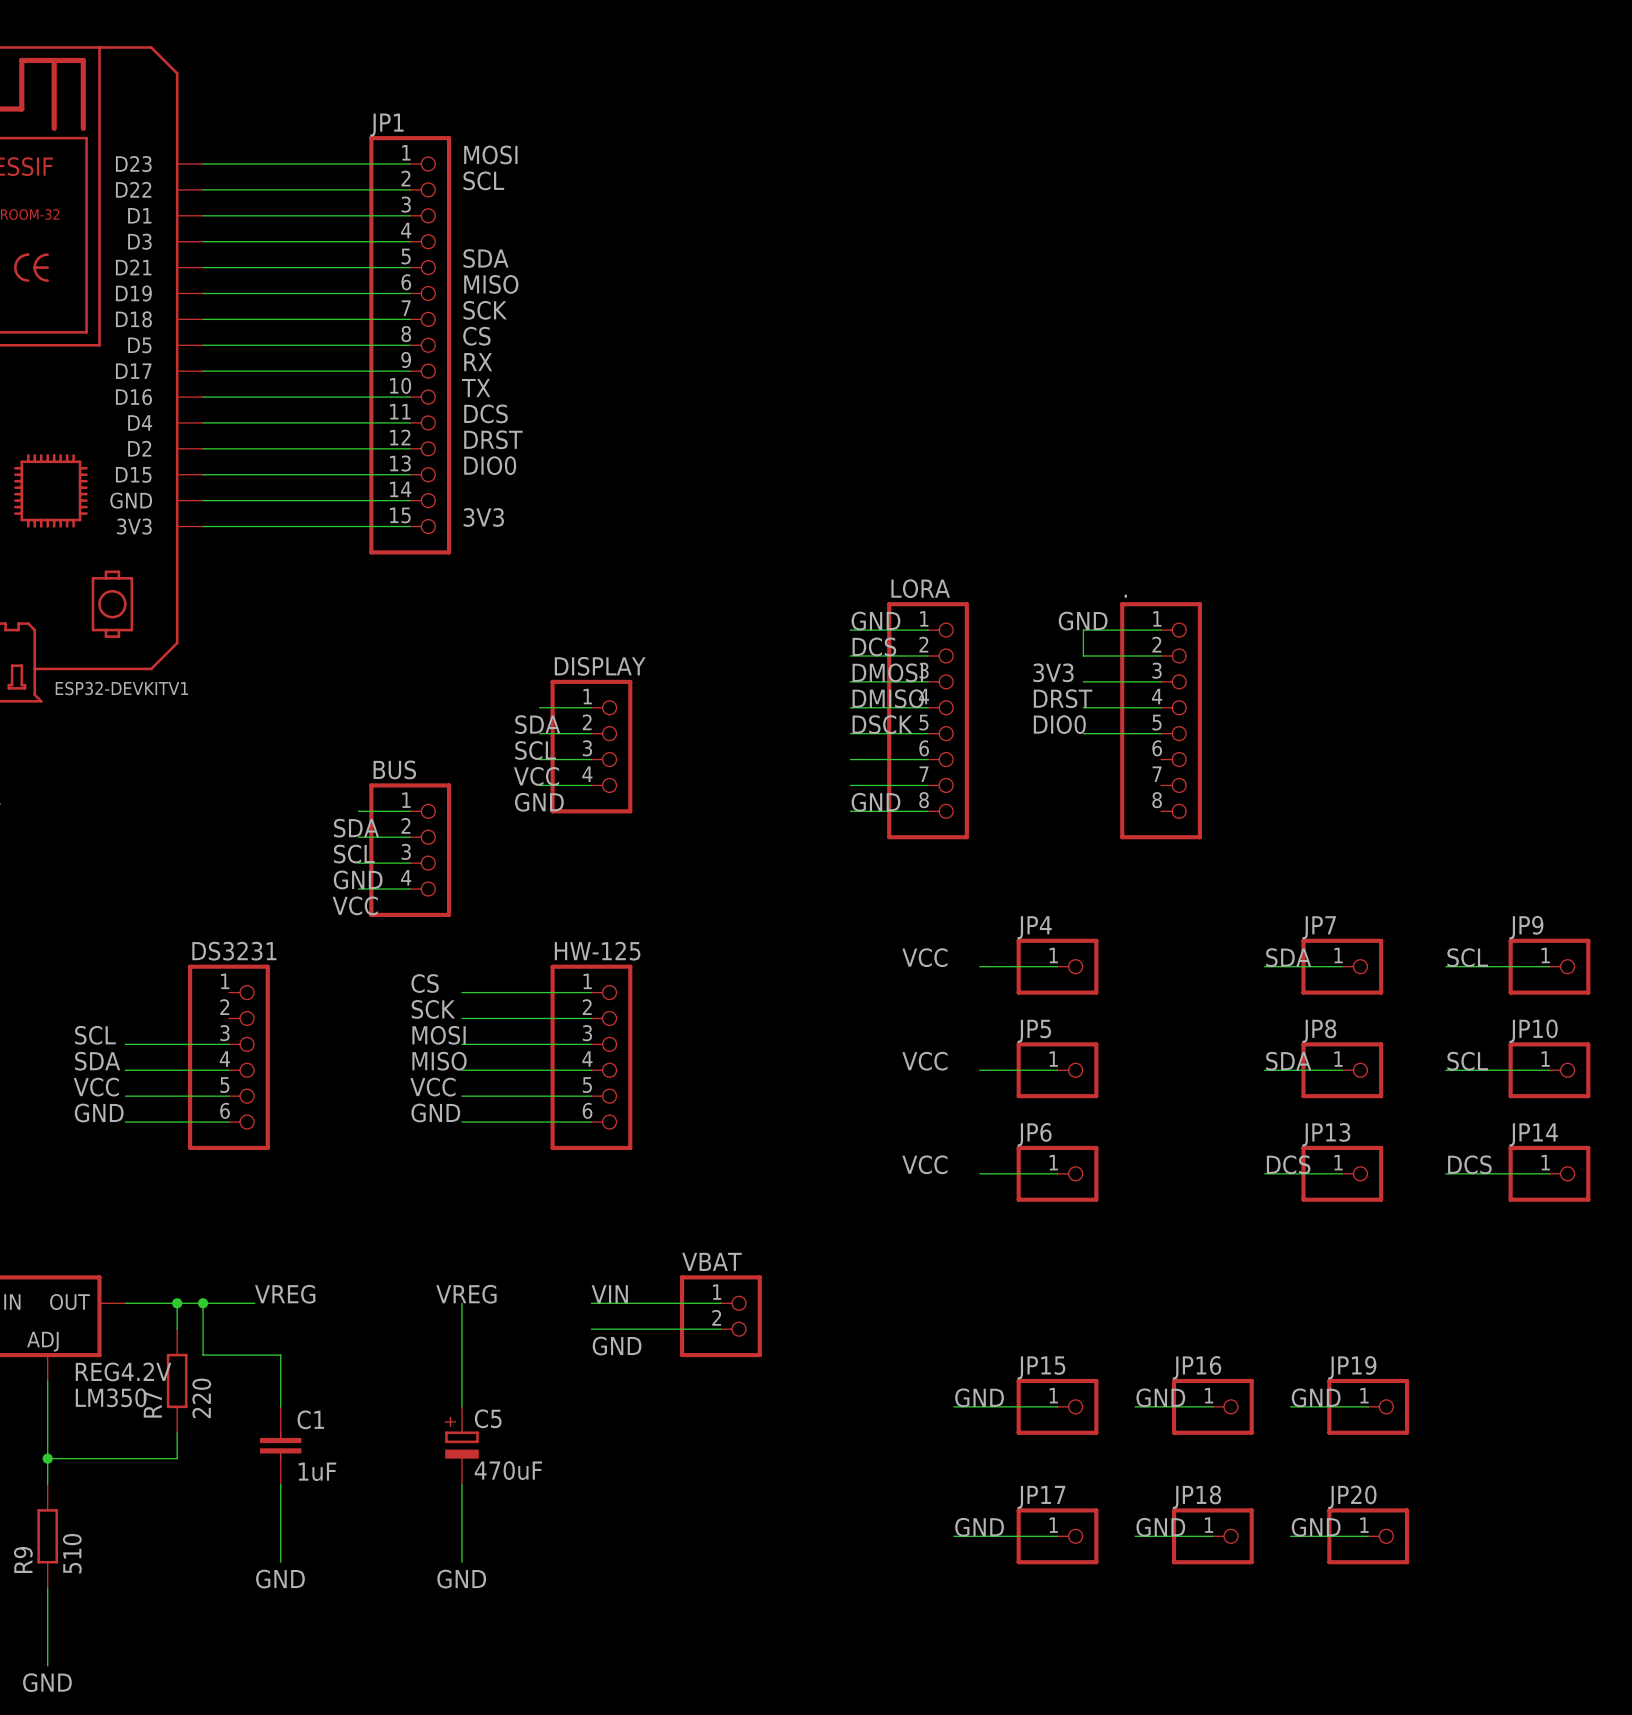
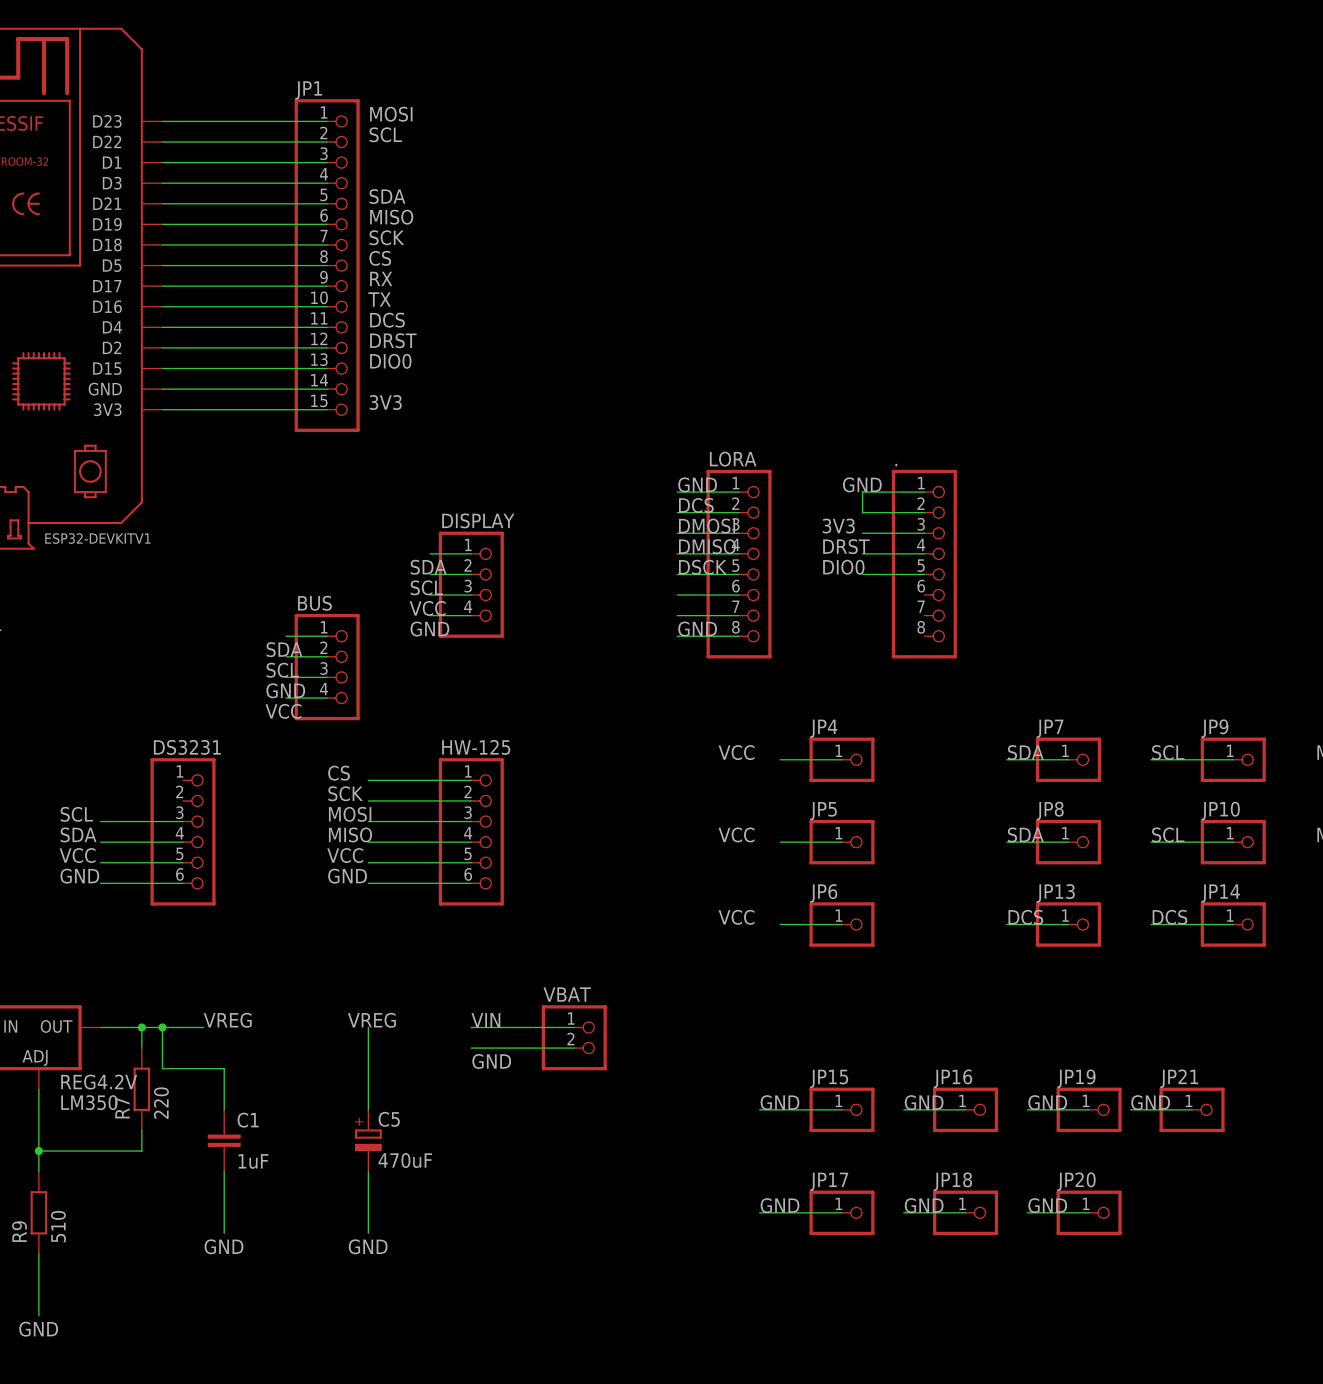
label: none -> GND (1150, 1102)
wire: none -> (1130, 1109) (1192, 1109)
JP21: none -> (1192, 1109)

